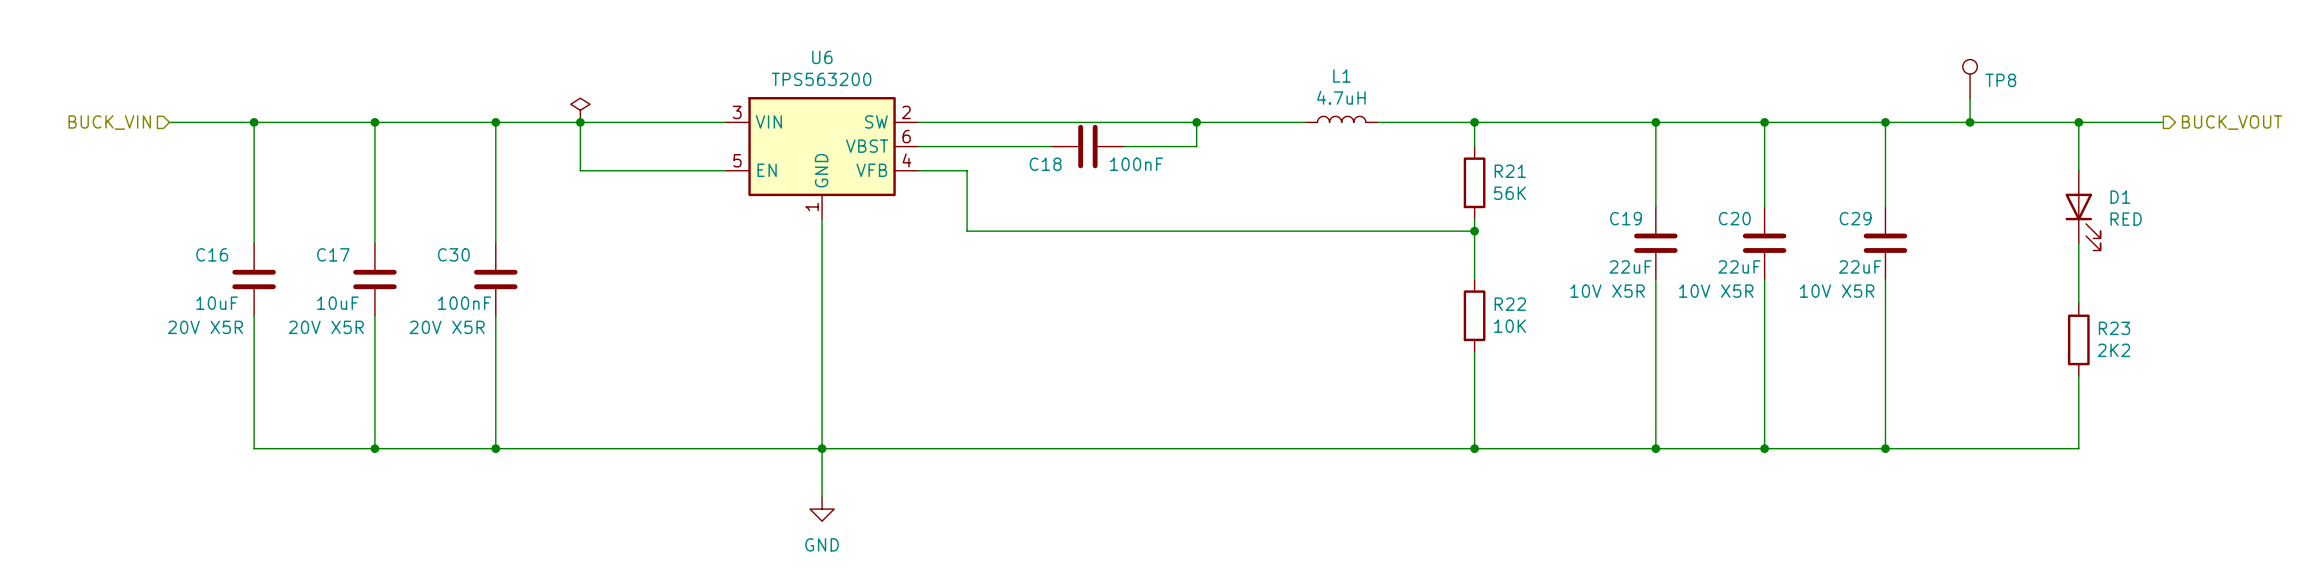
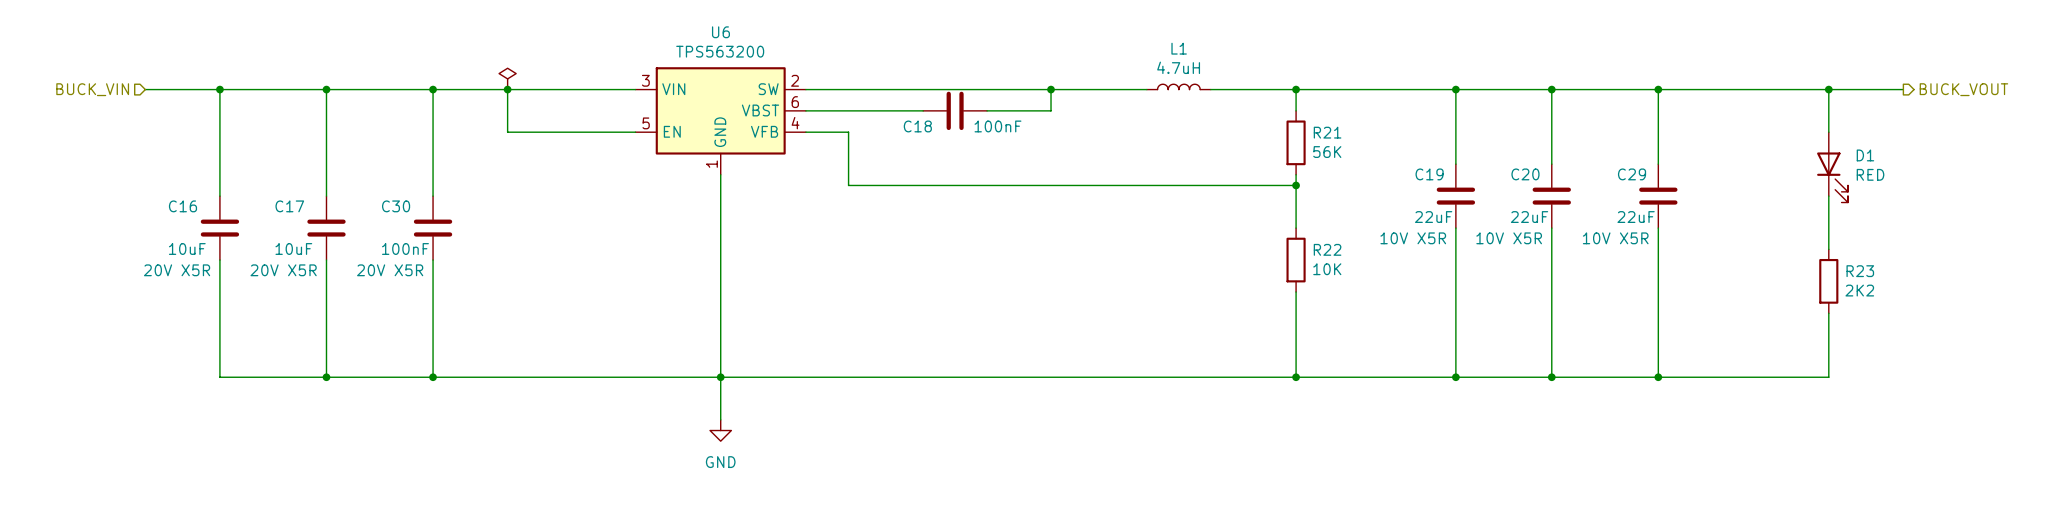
TP8: (1970, 78) -> none
wire: (1970, 98) (1970, 122) -> none
junction: (1970, 122) -> none

